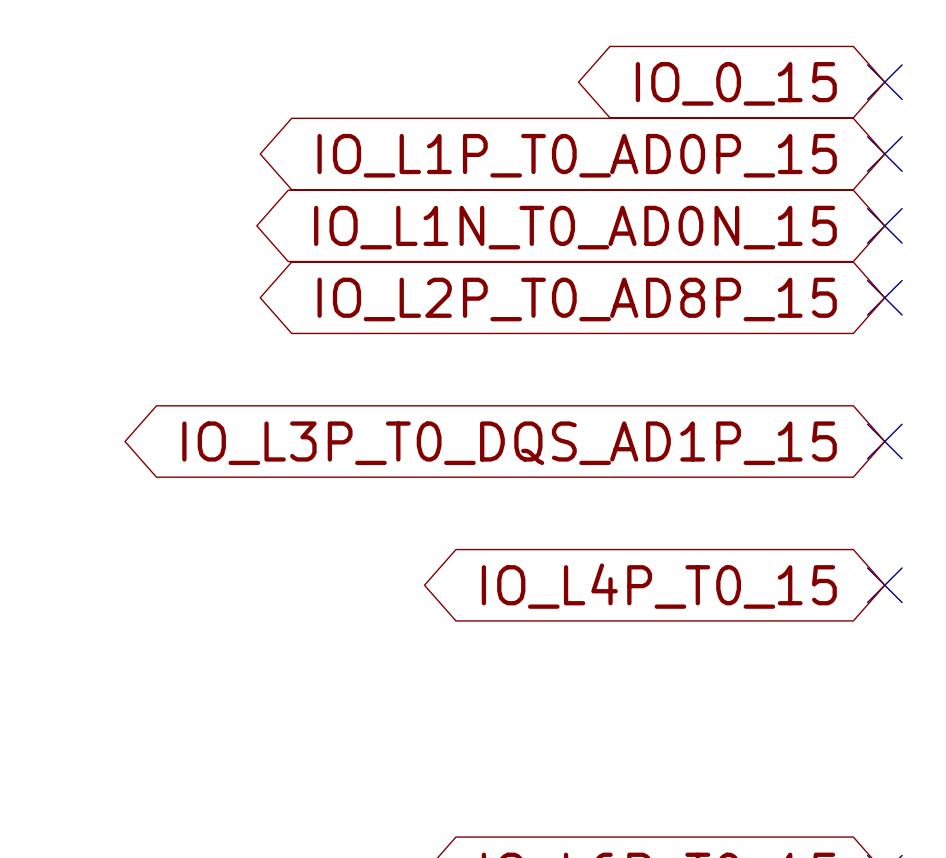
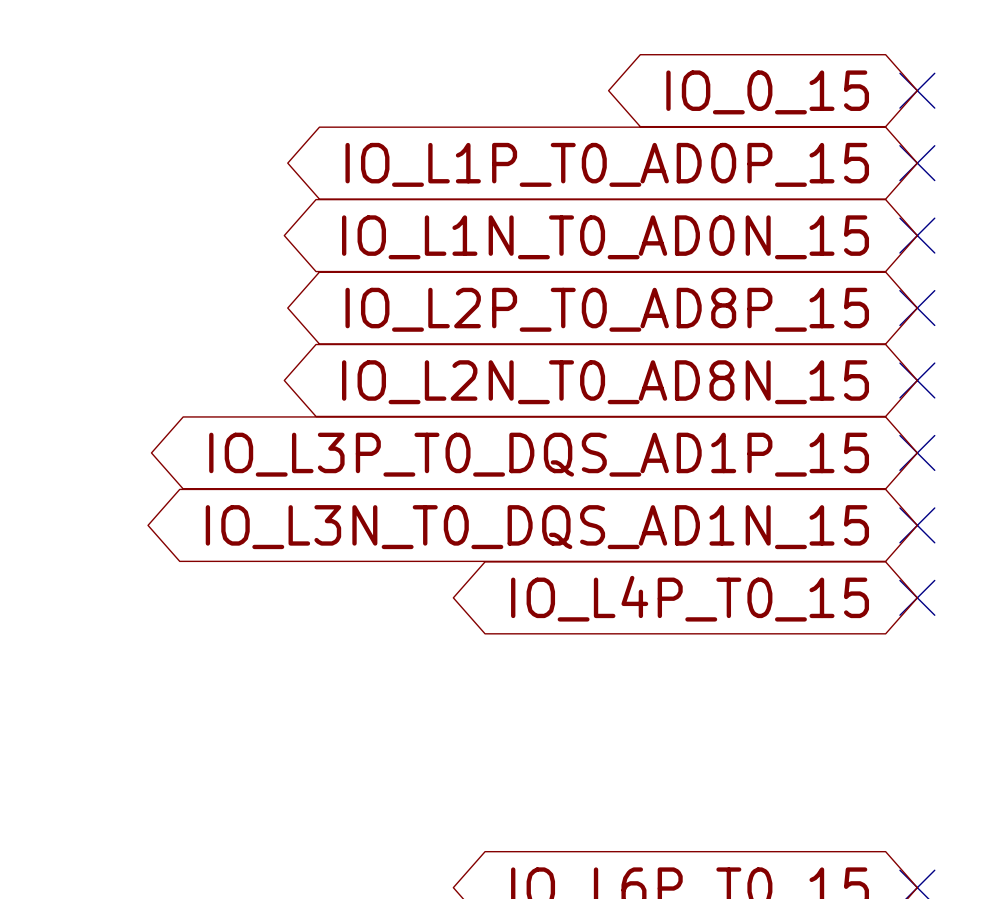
no-connect mark: none -> (917, 380)
global label: none -> IO_L2N_T0_AD8N_15 (605, 382)
no-connect mark: none -> (917, 525)
global label: none -> IO_L3N_T0_DQS_AD1N_15 (537, 527)

